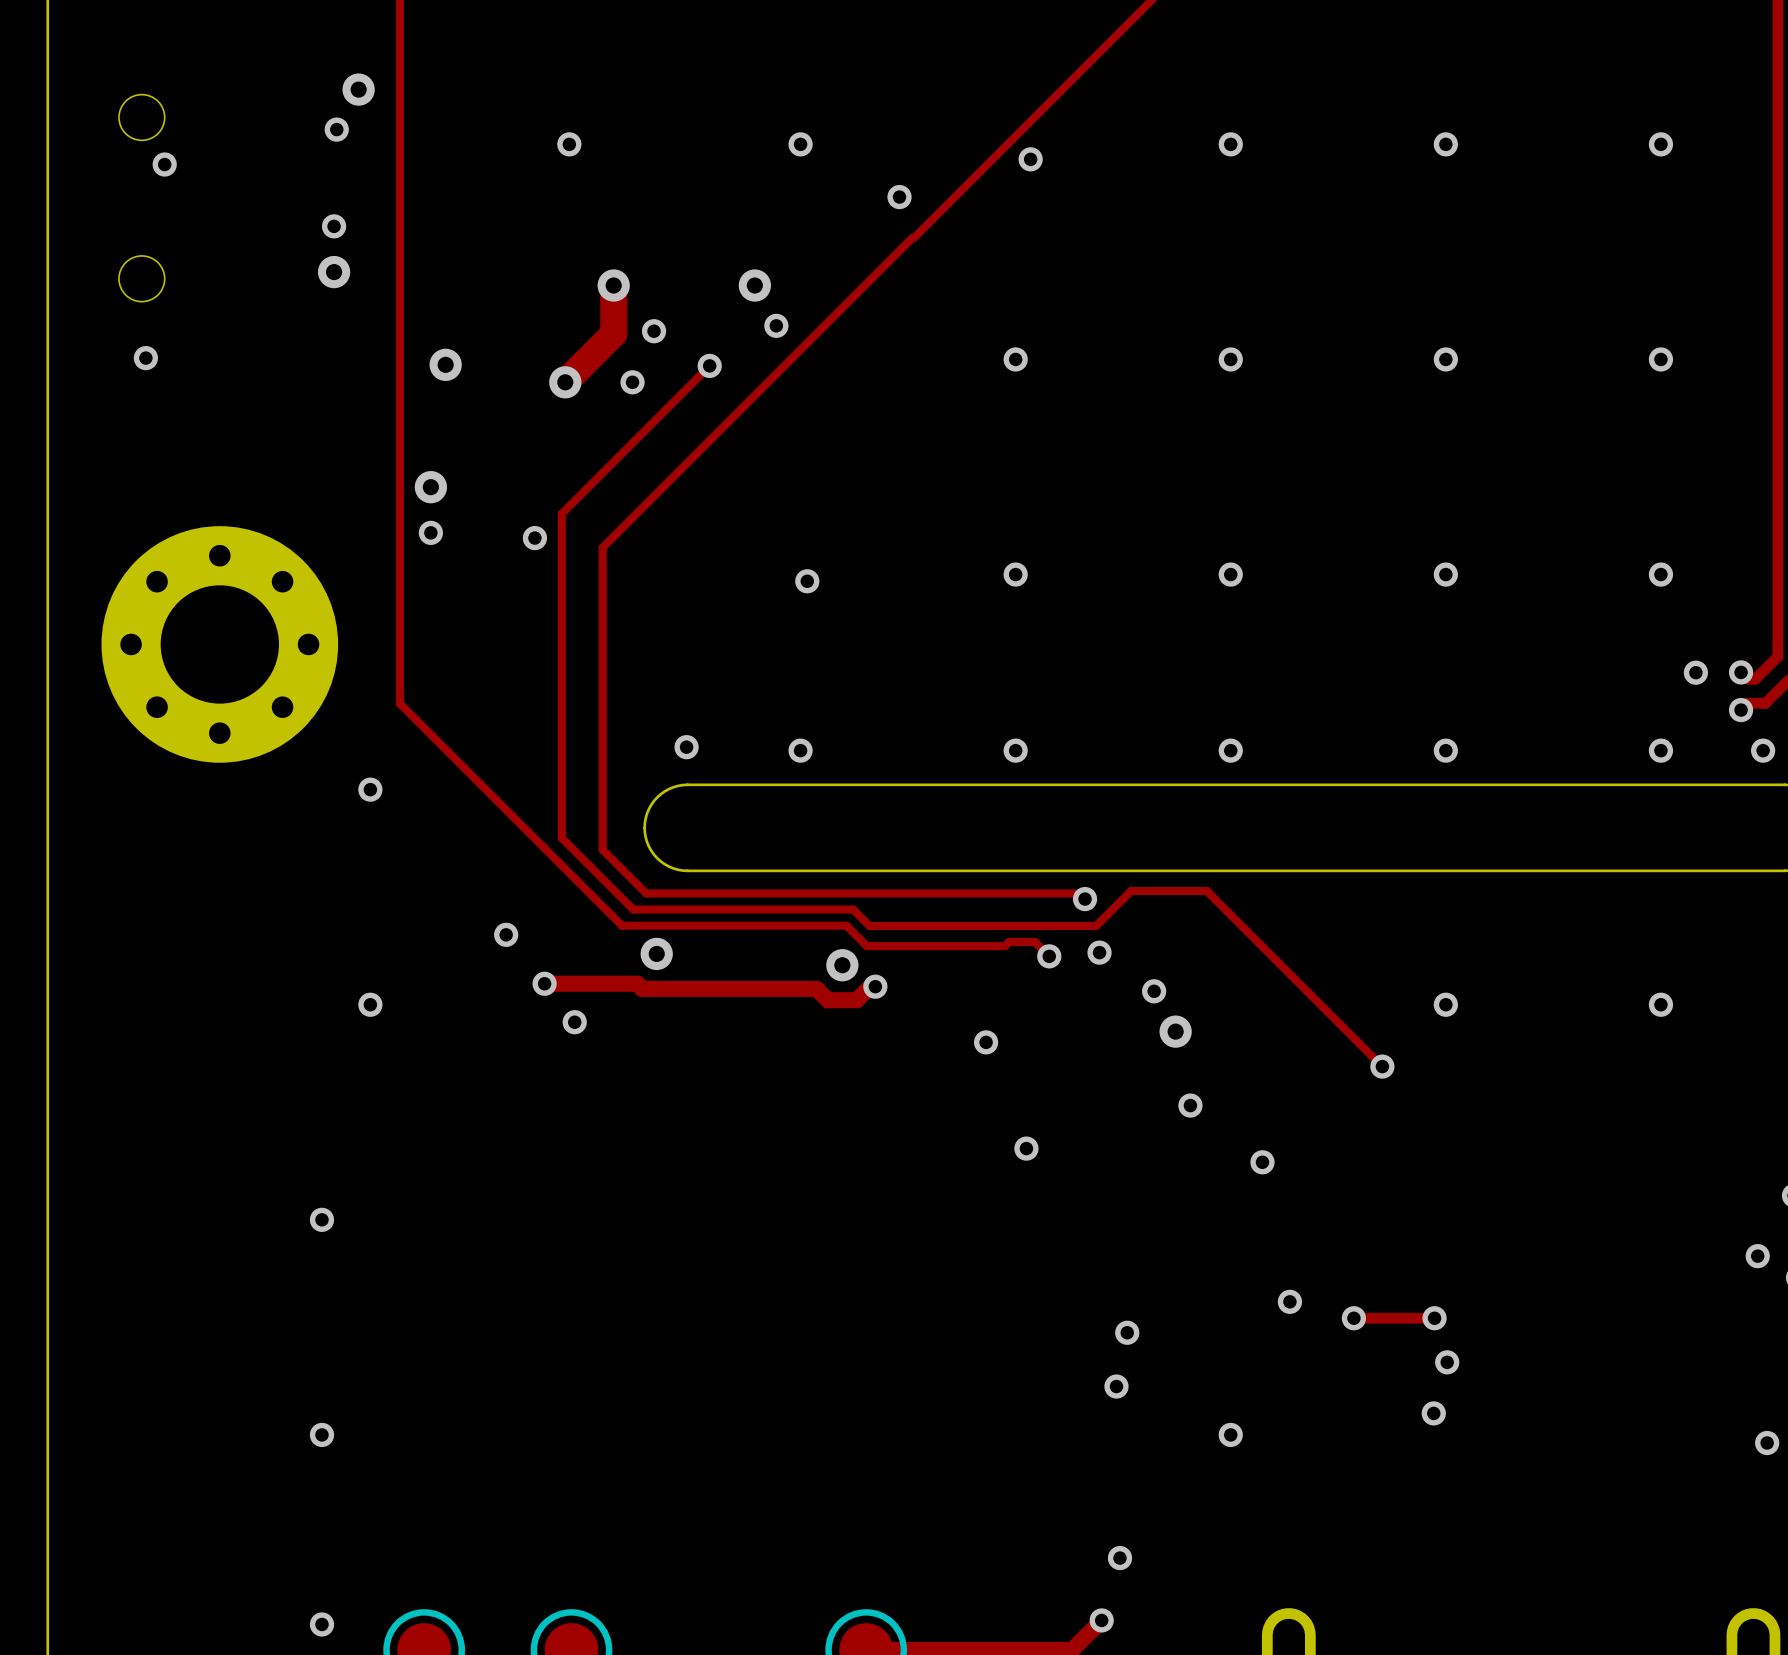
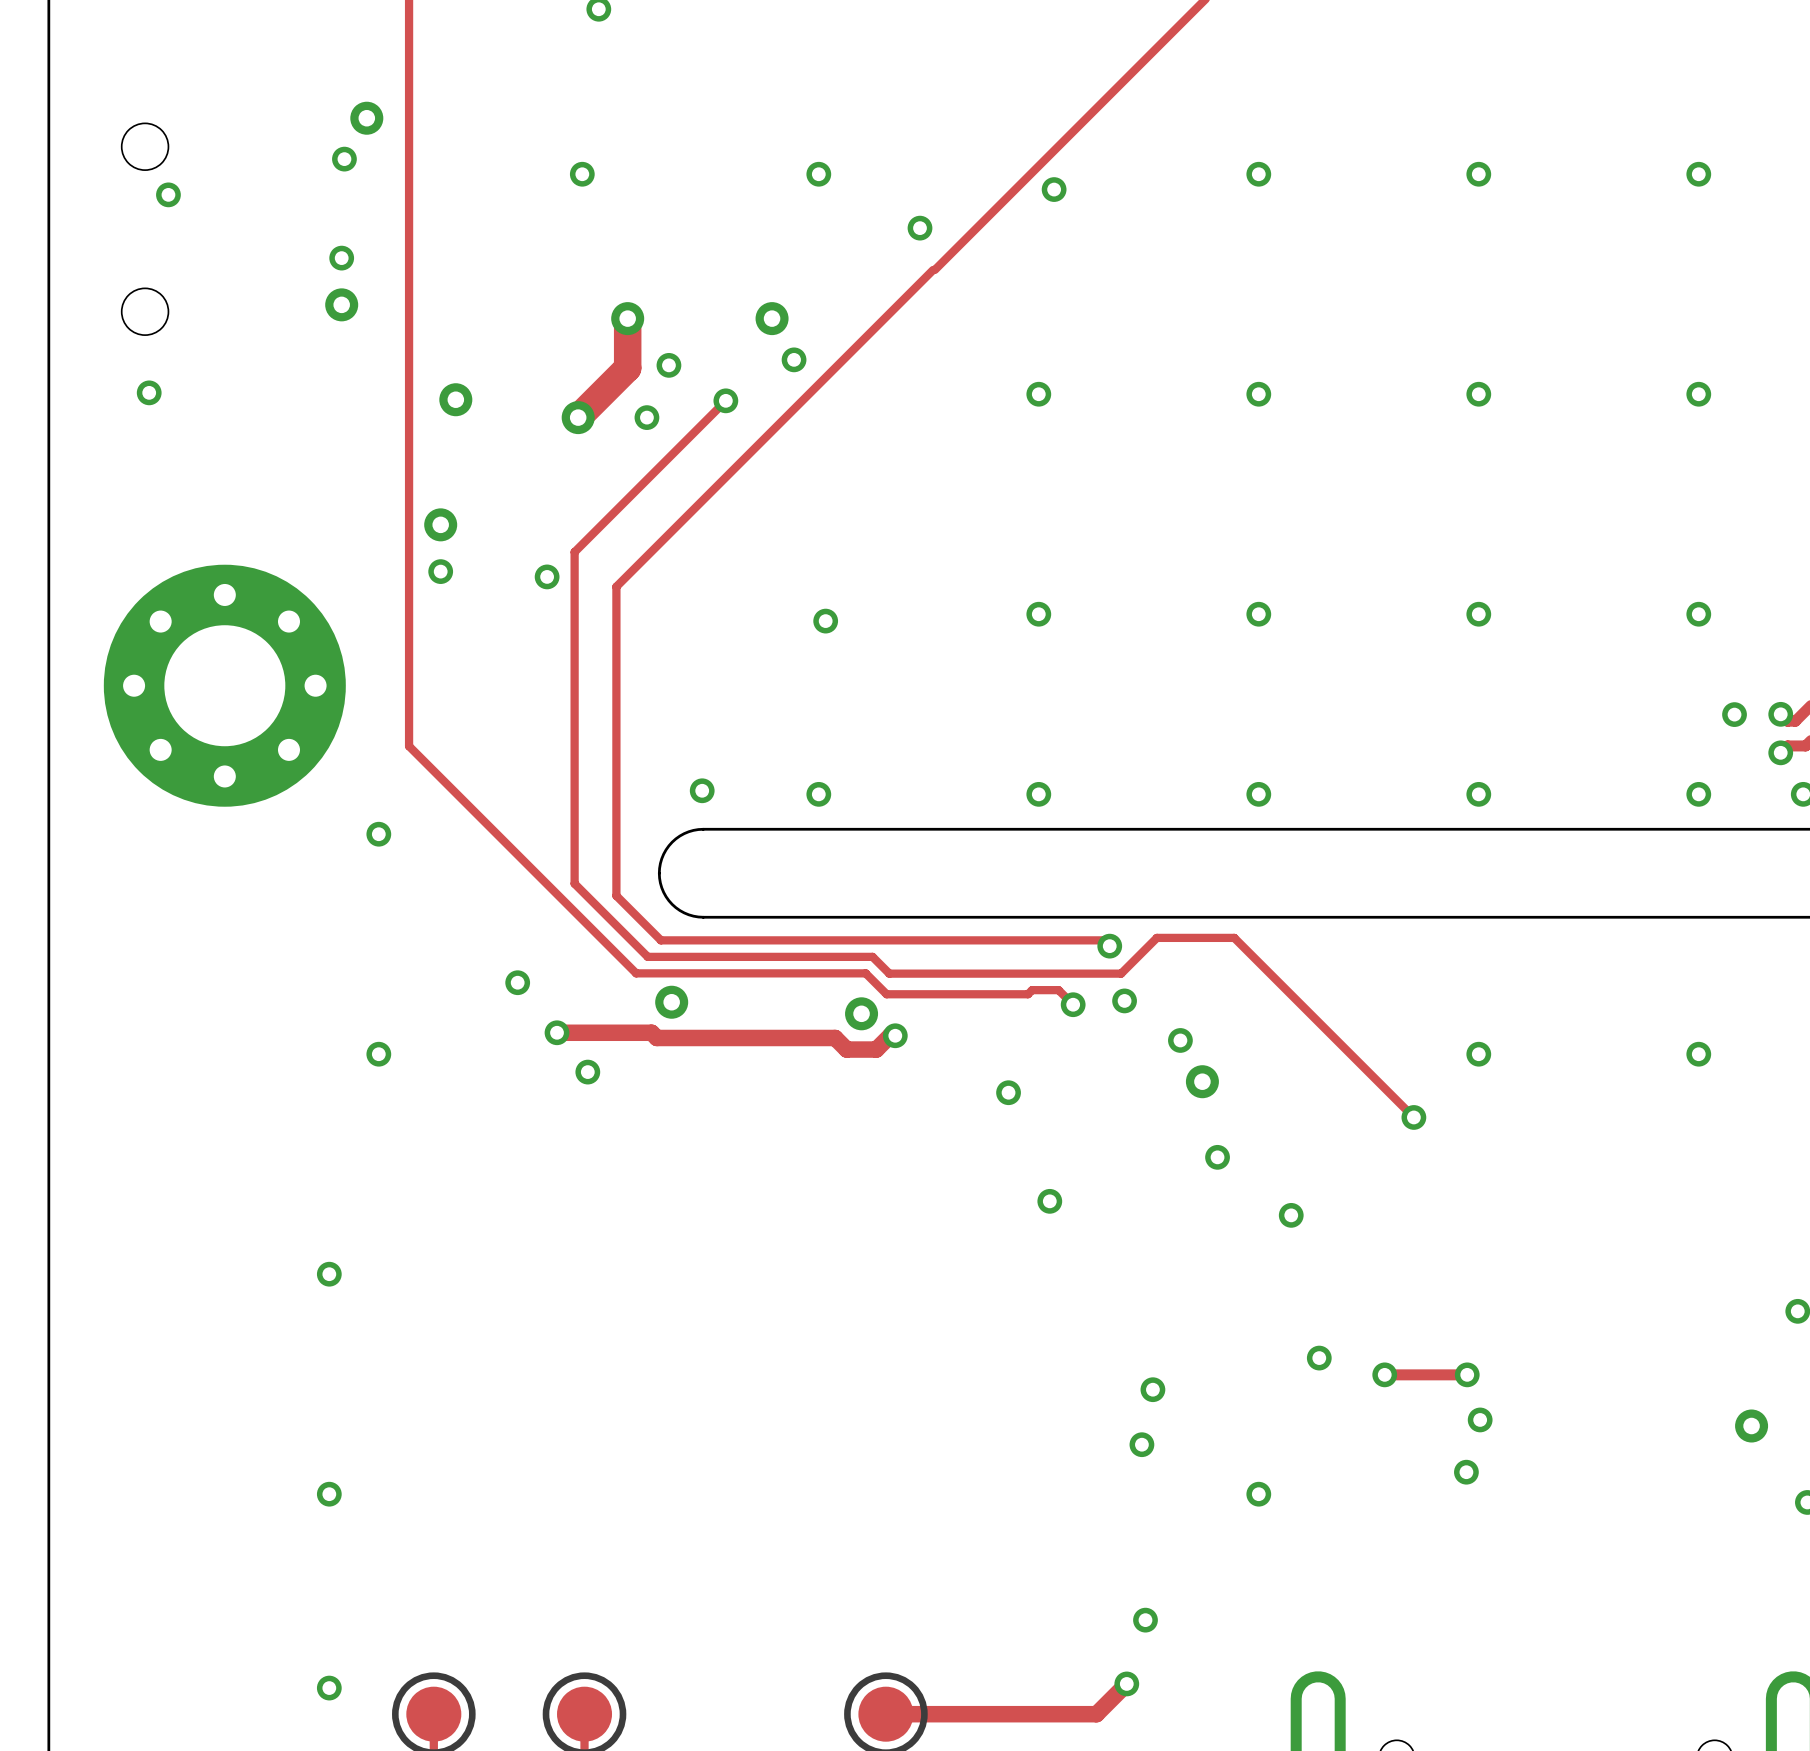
via: none -> (1751, 1426)

